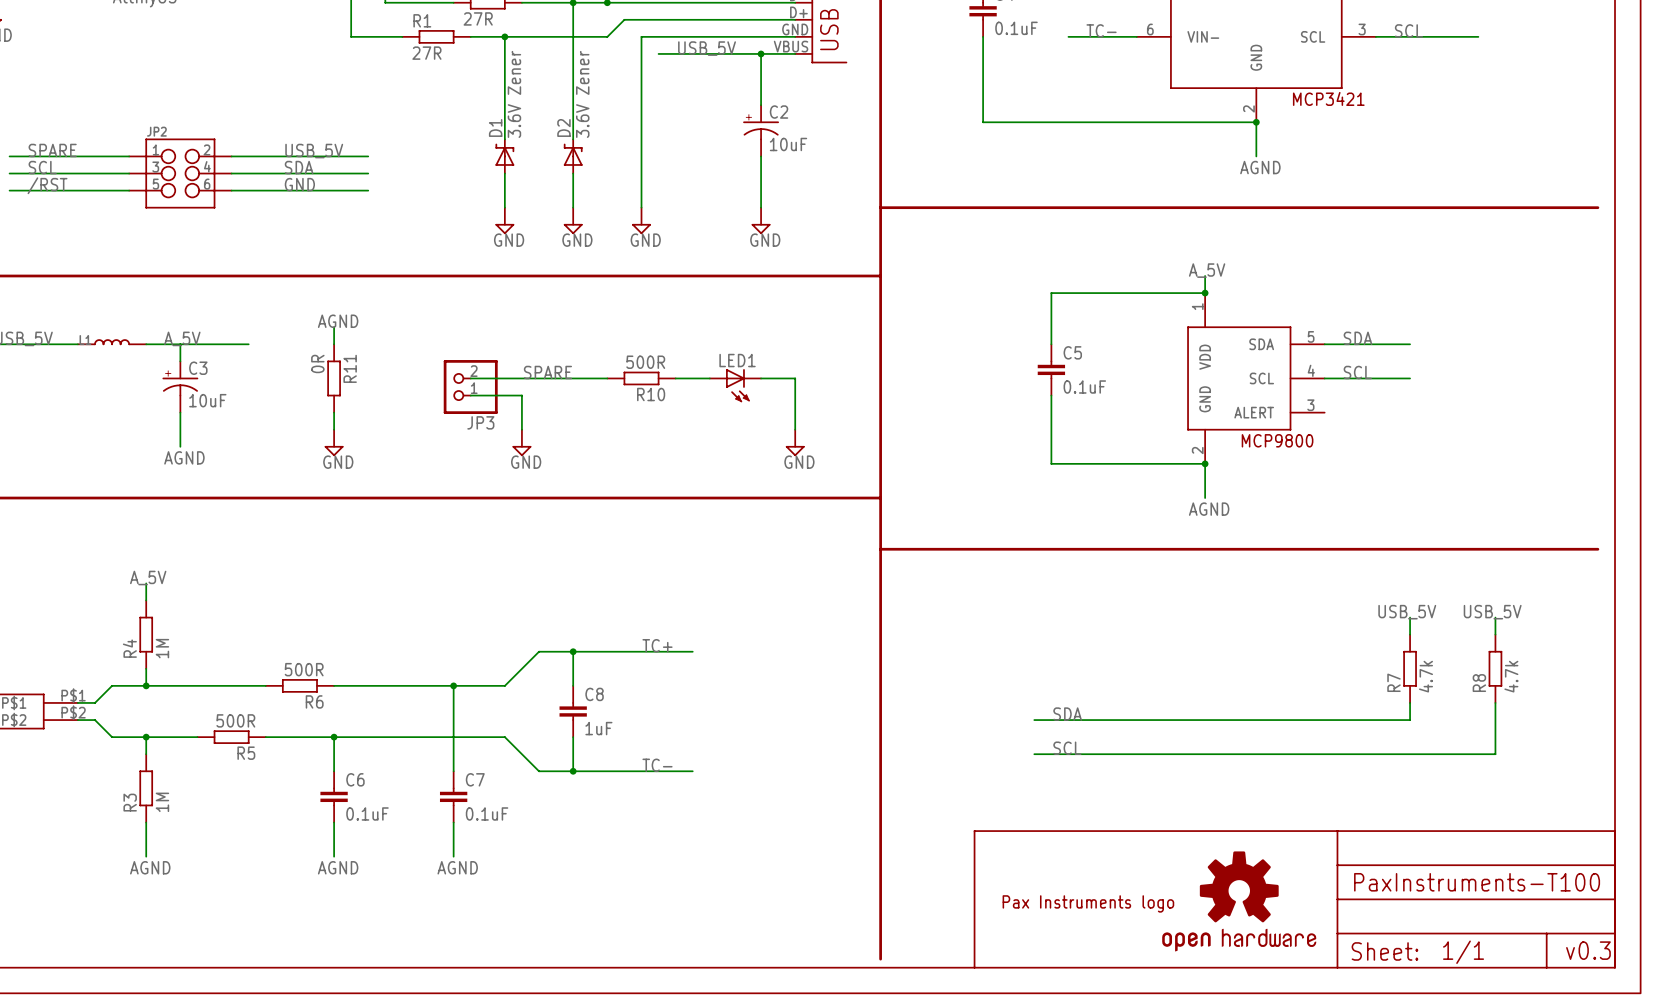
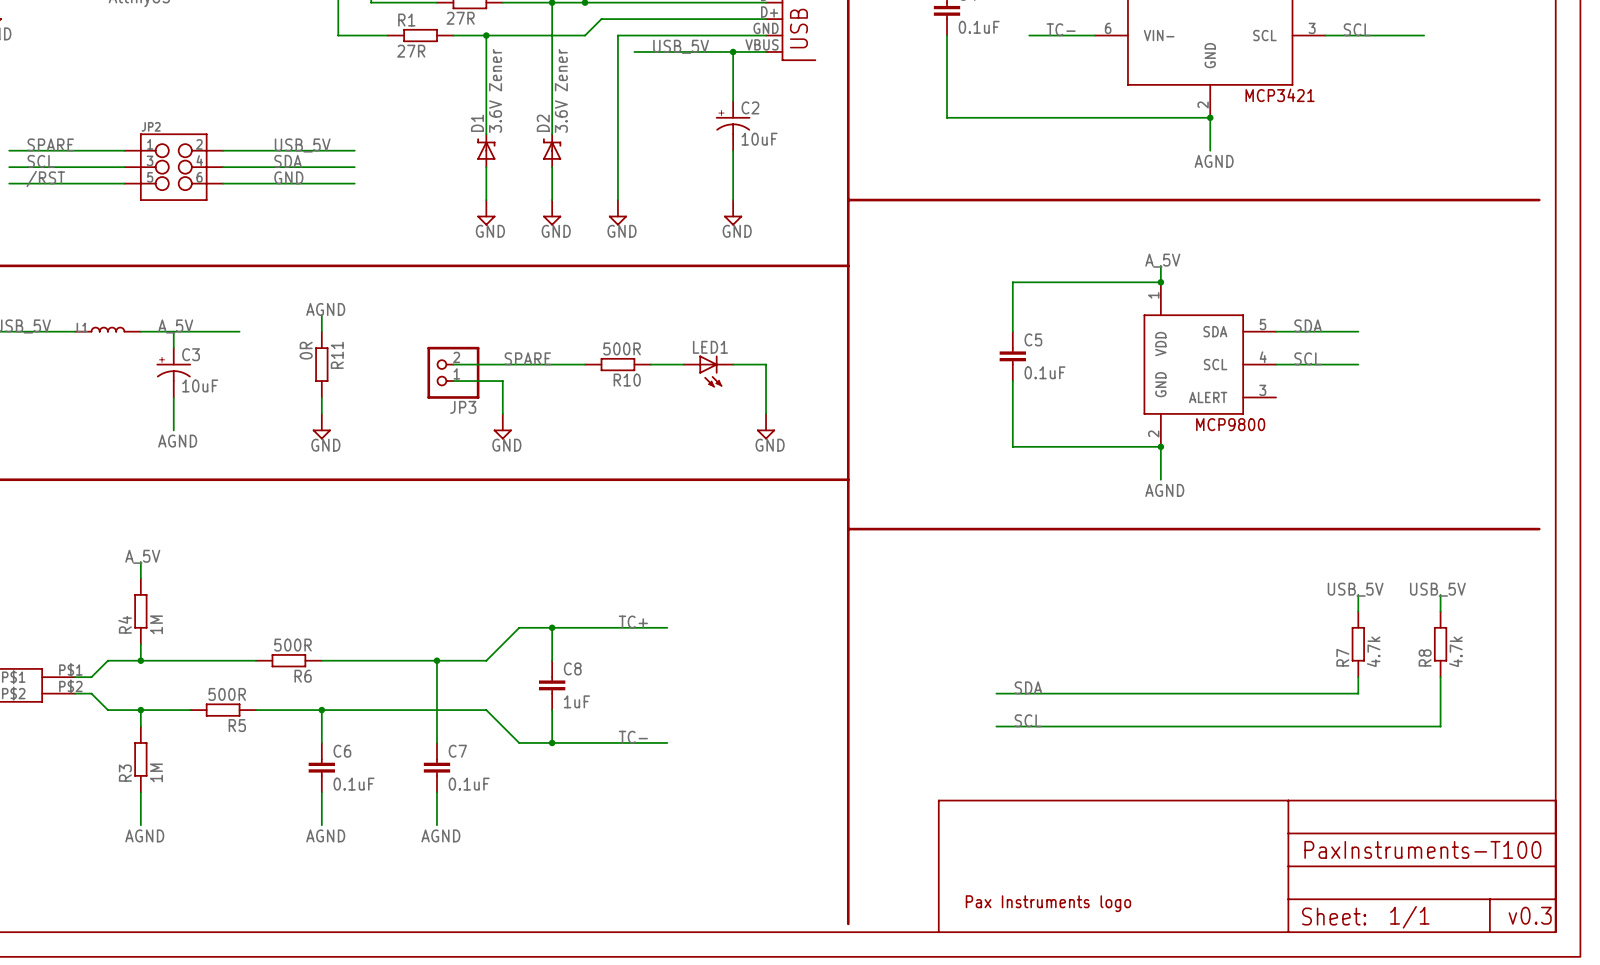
part: (1239, 901) -> none
part position: (1088, 903) -> (1048, 903)

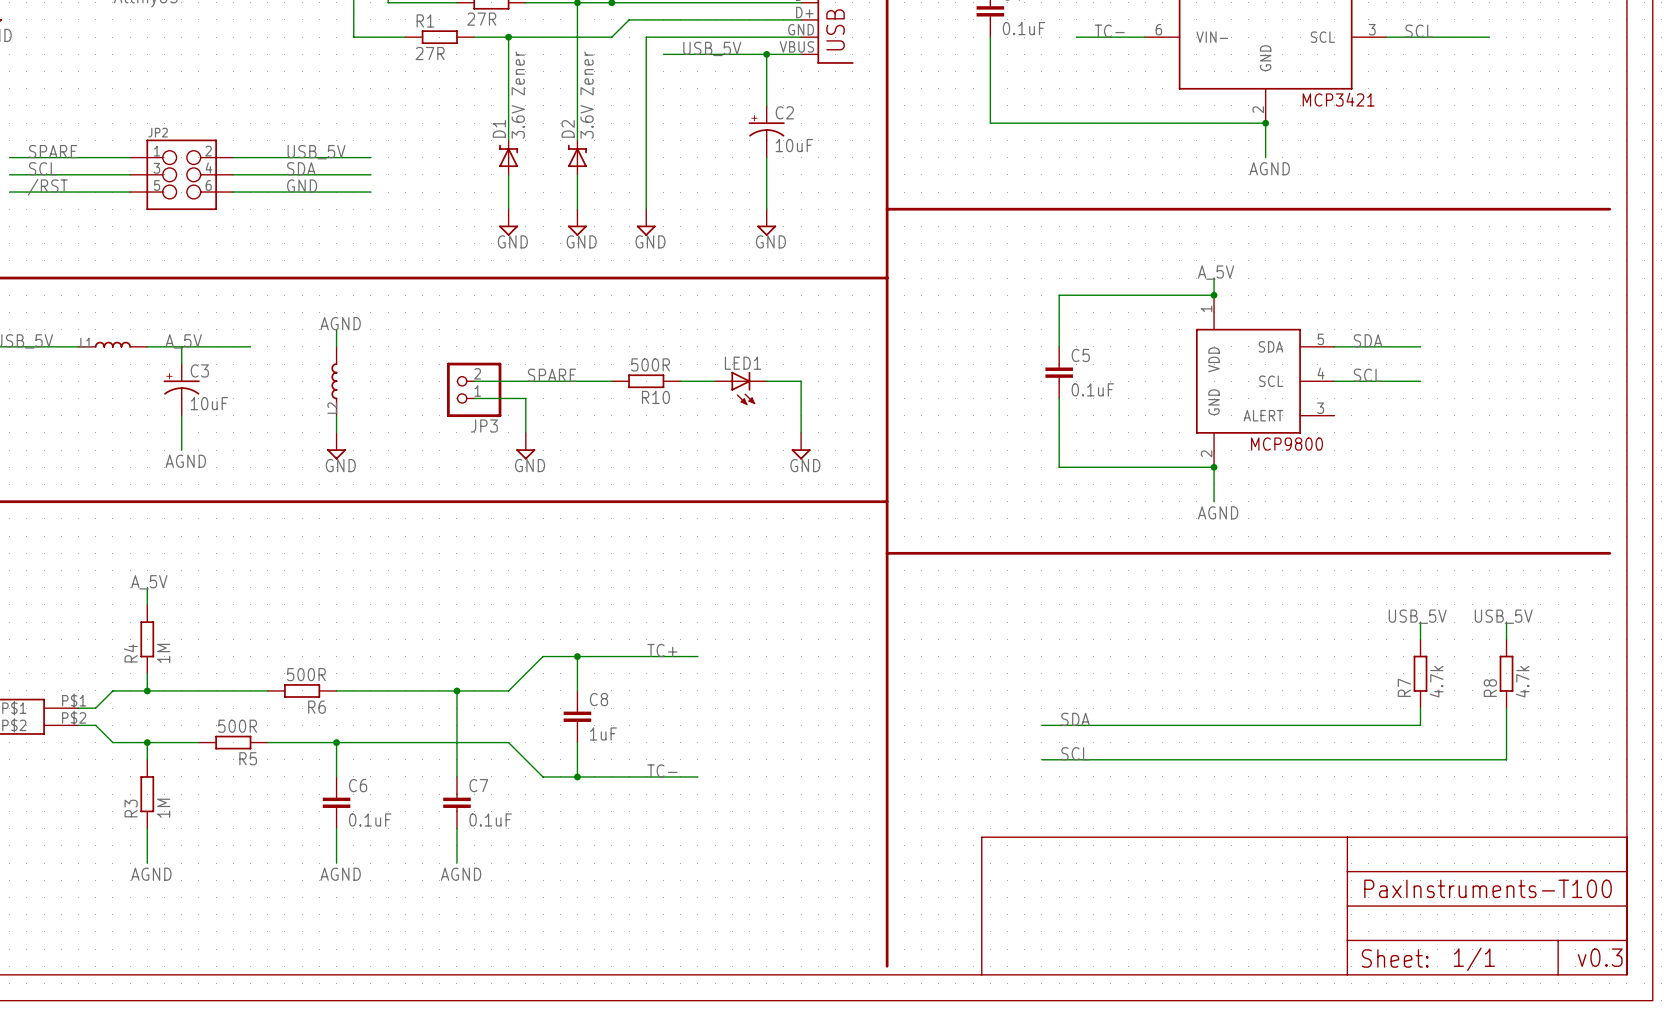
L2: none -> (334, 381)
R11: 0R (321, 364) -> none
part: (1048, 903) -> none

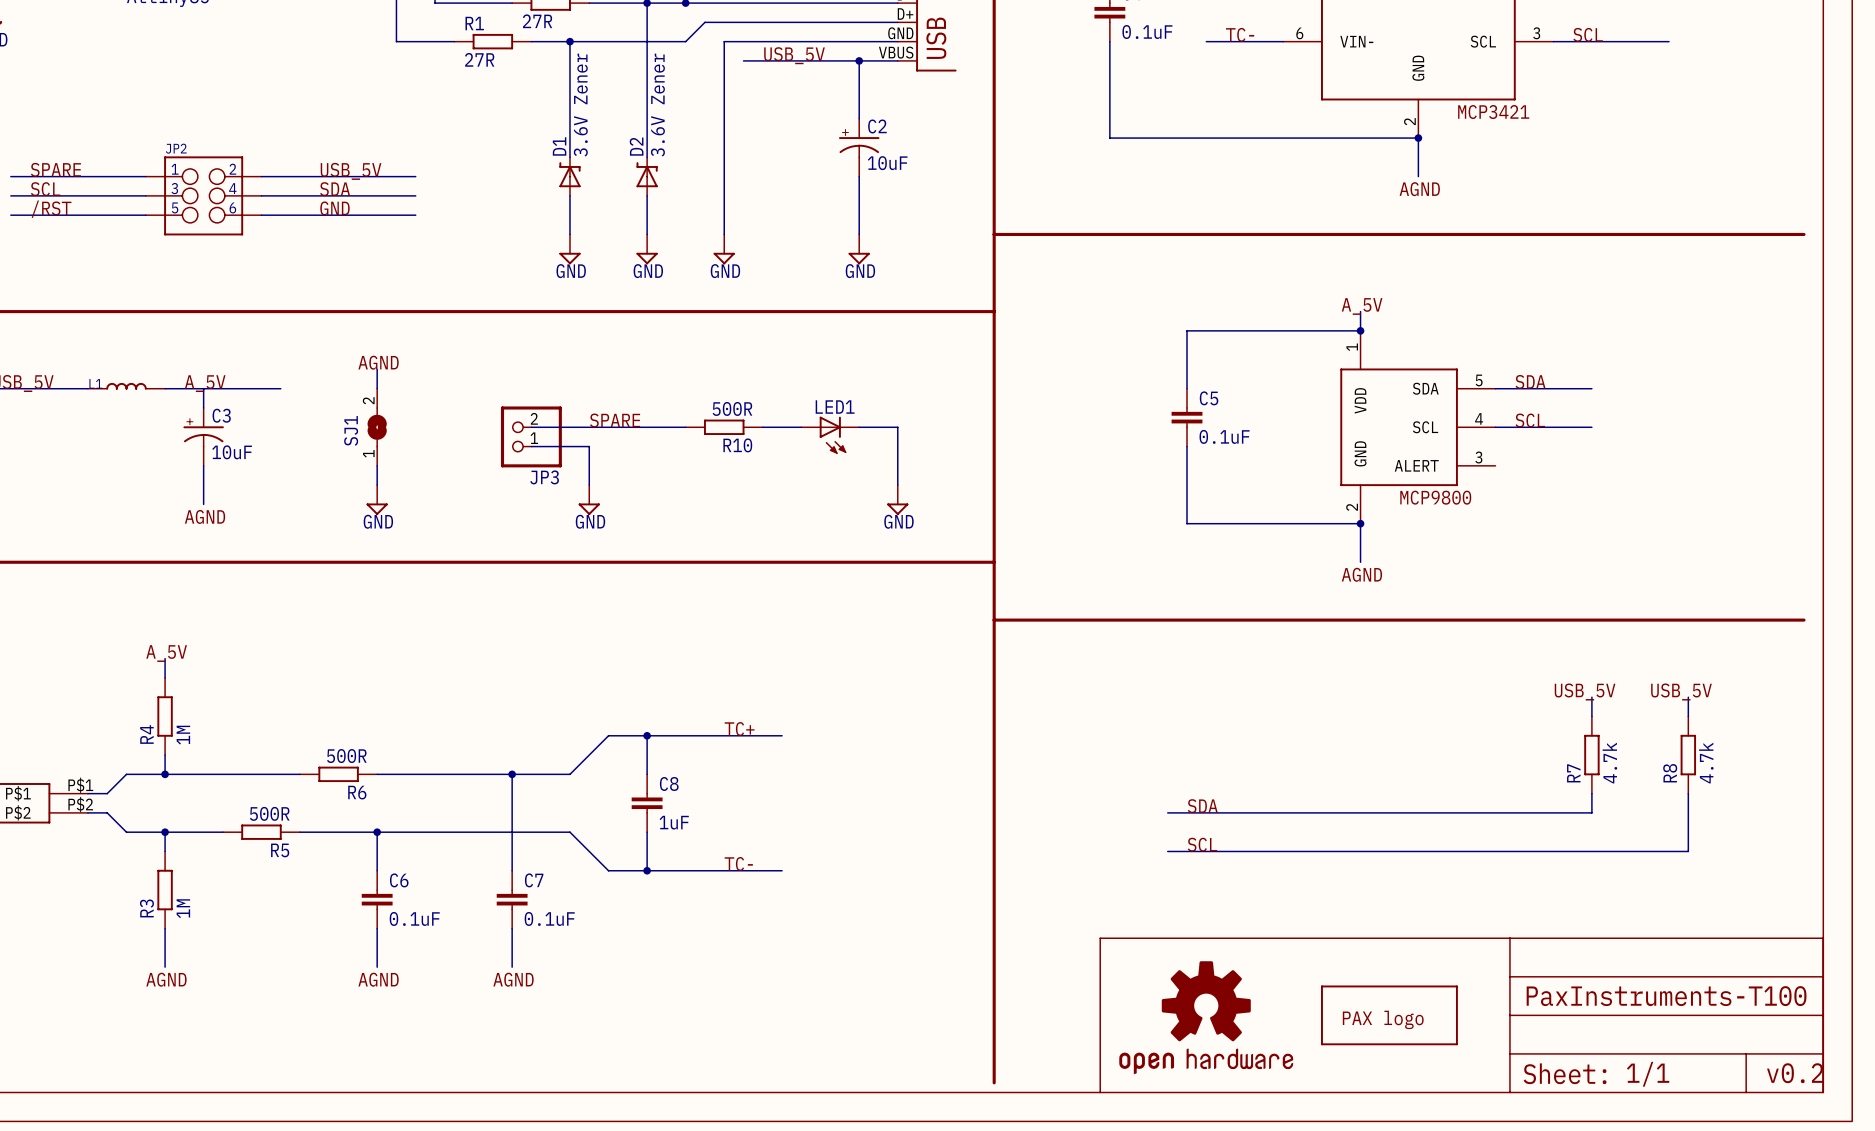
L2: (334, 381) -> none
SJ1: none -> (377, 427)
part: none -> (1389, 1015)
part: none -> (1206, 1017)
text: v0.3 (1600, 957) -> v0.2 (1795, 1073)

